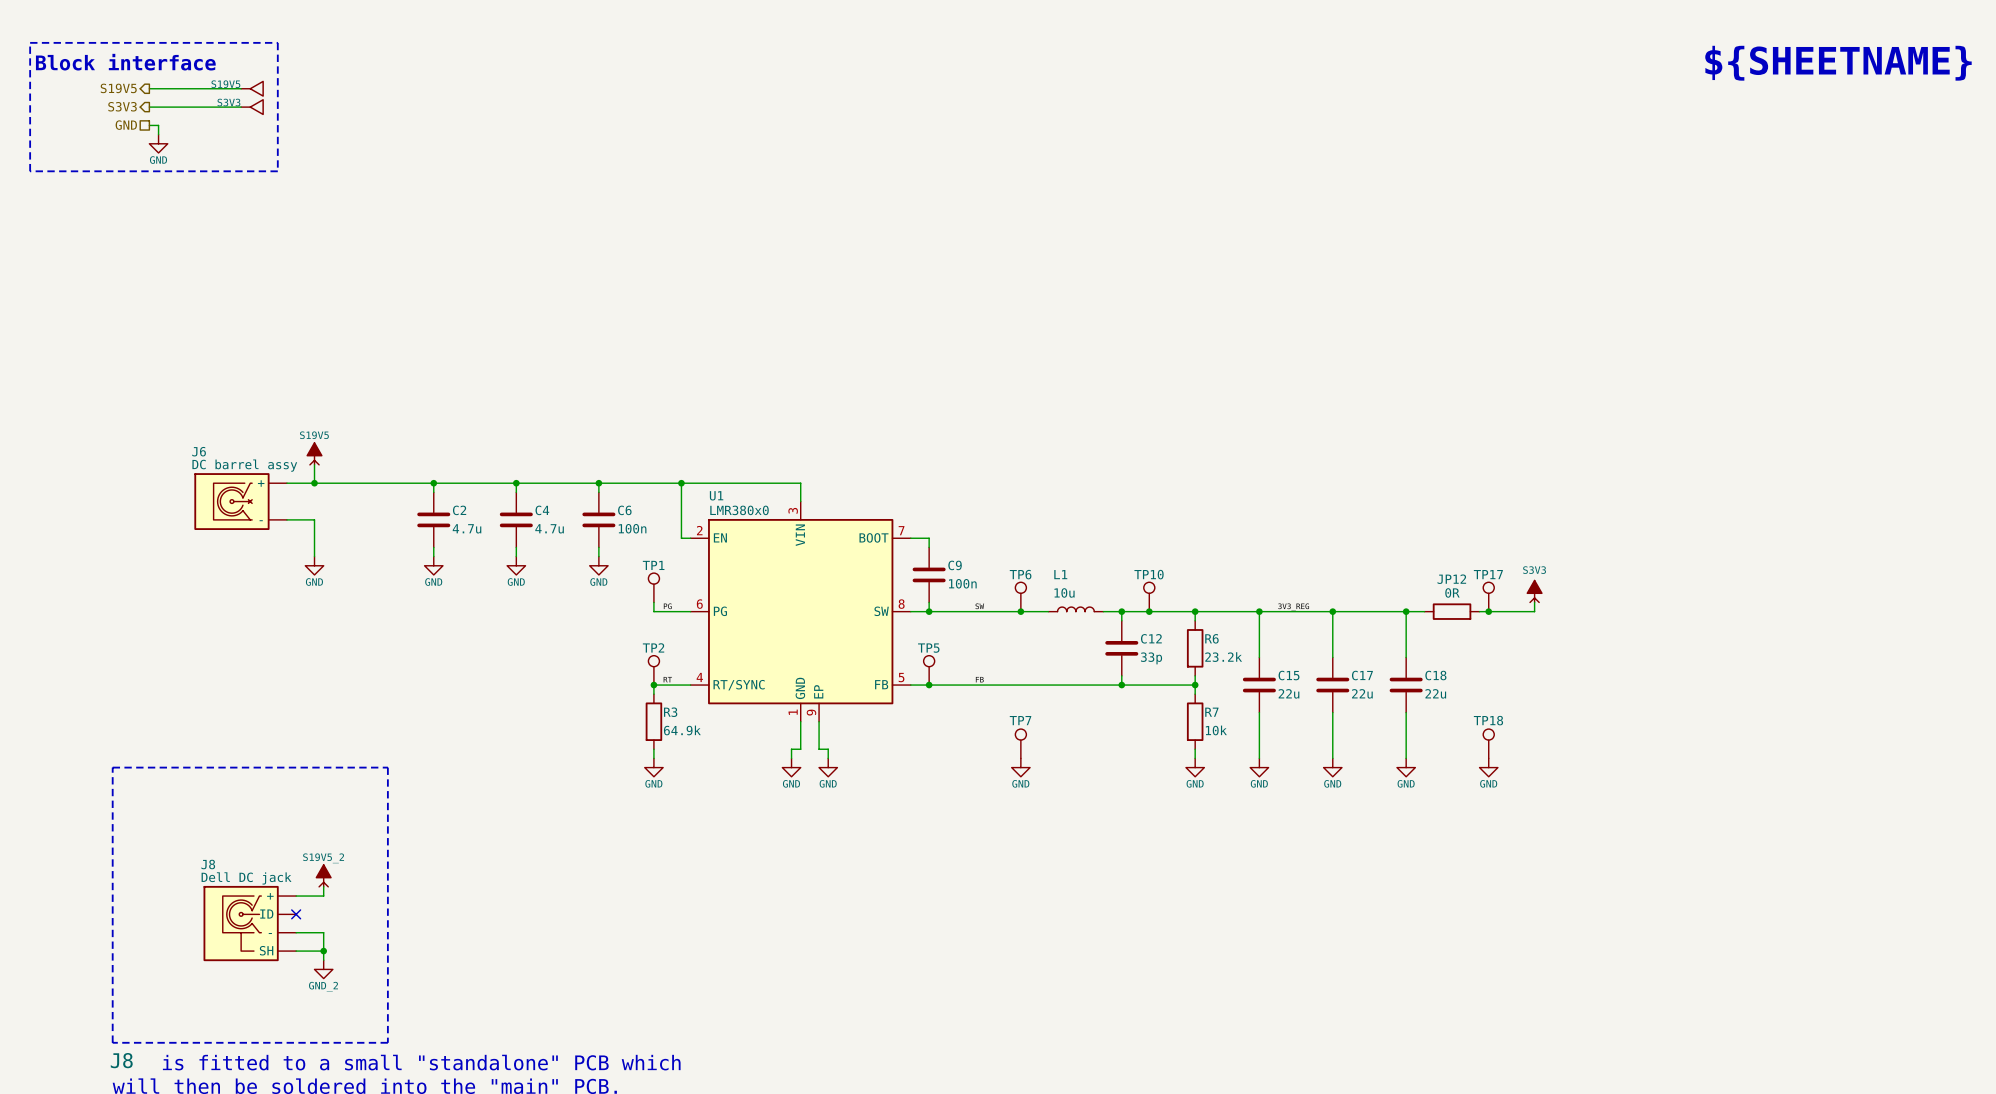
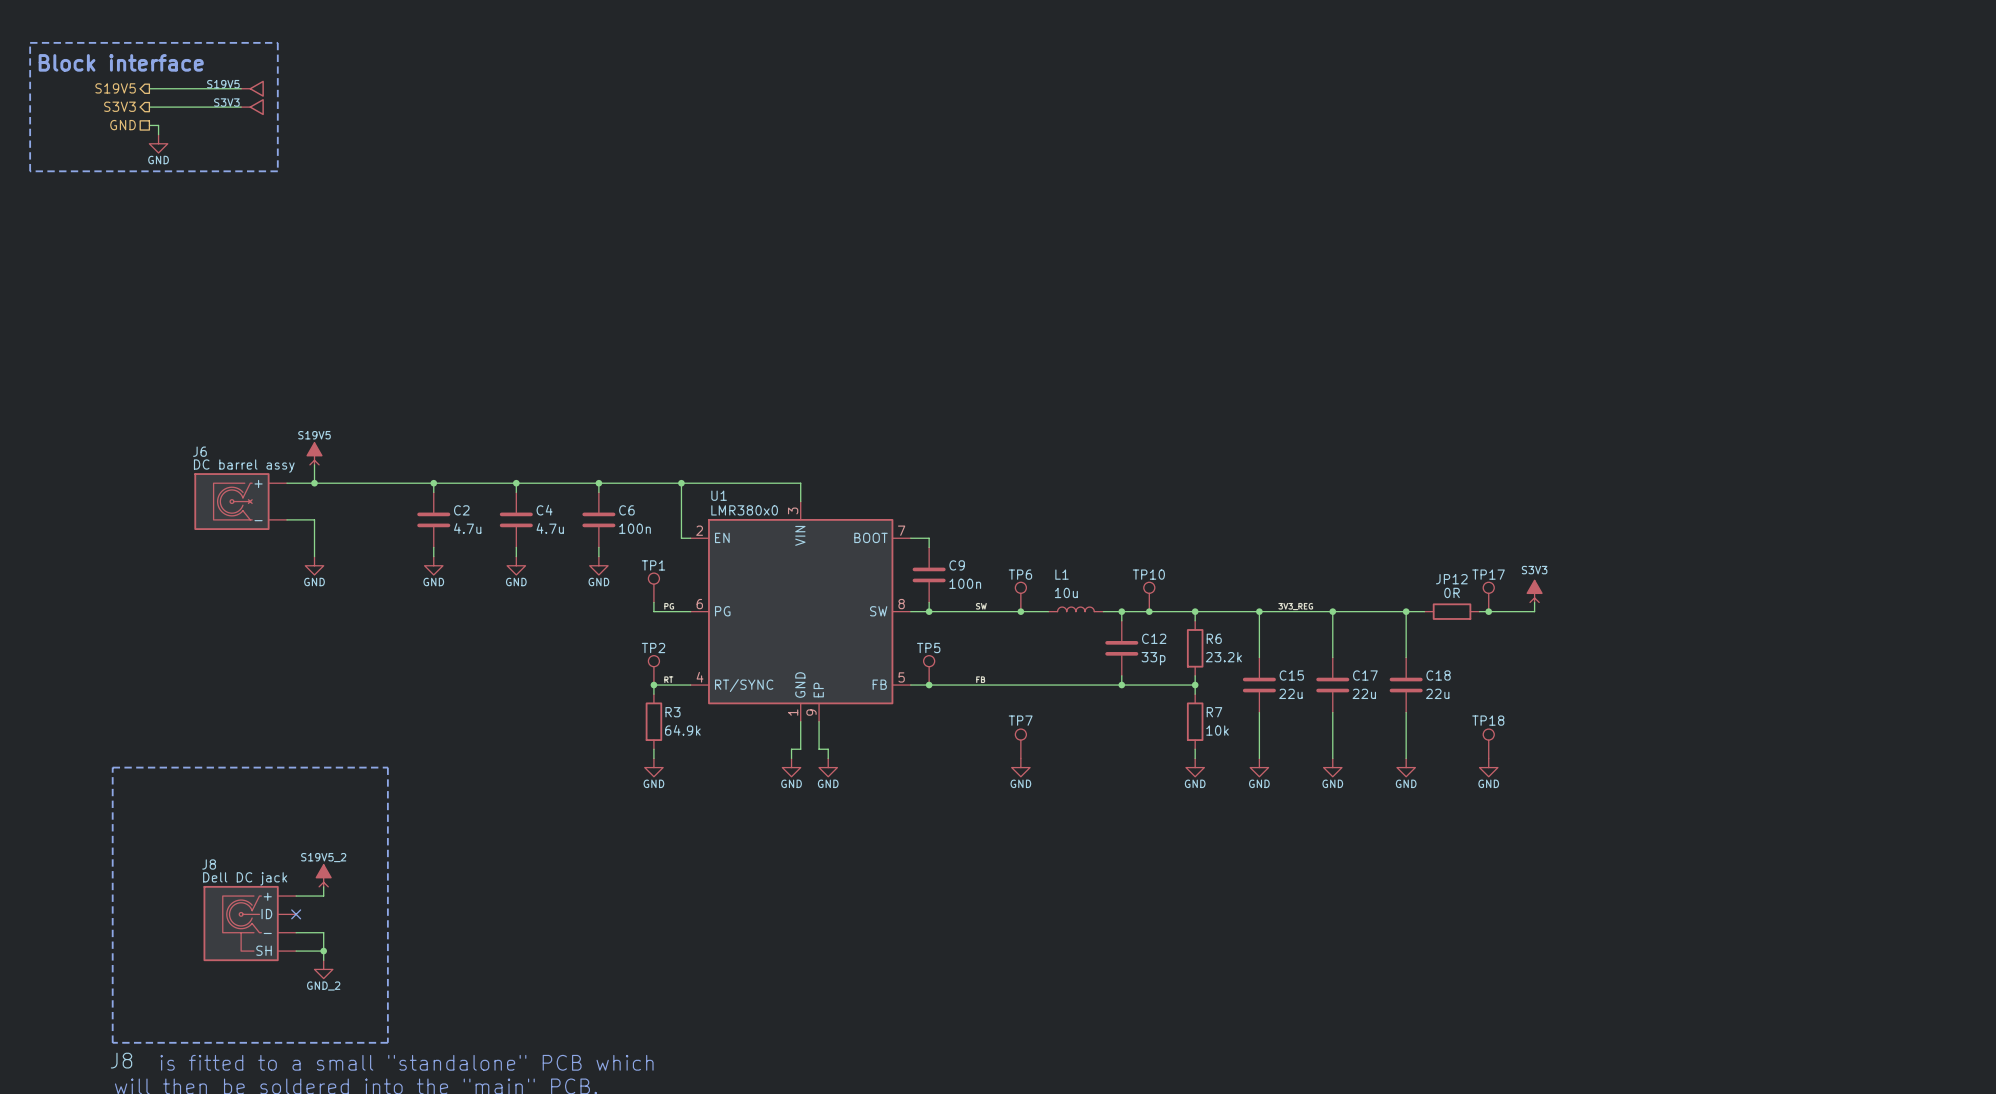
text: ${SHEETNAME} (1838, 63) -> none

